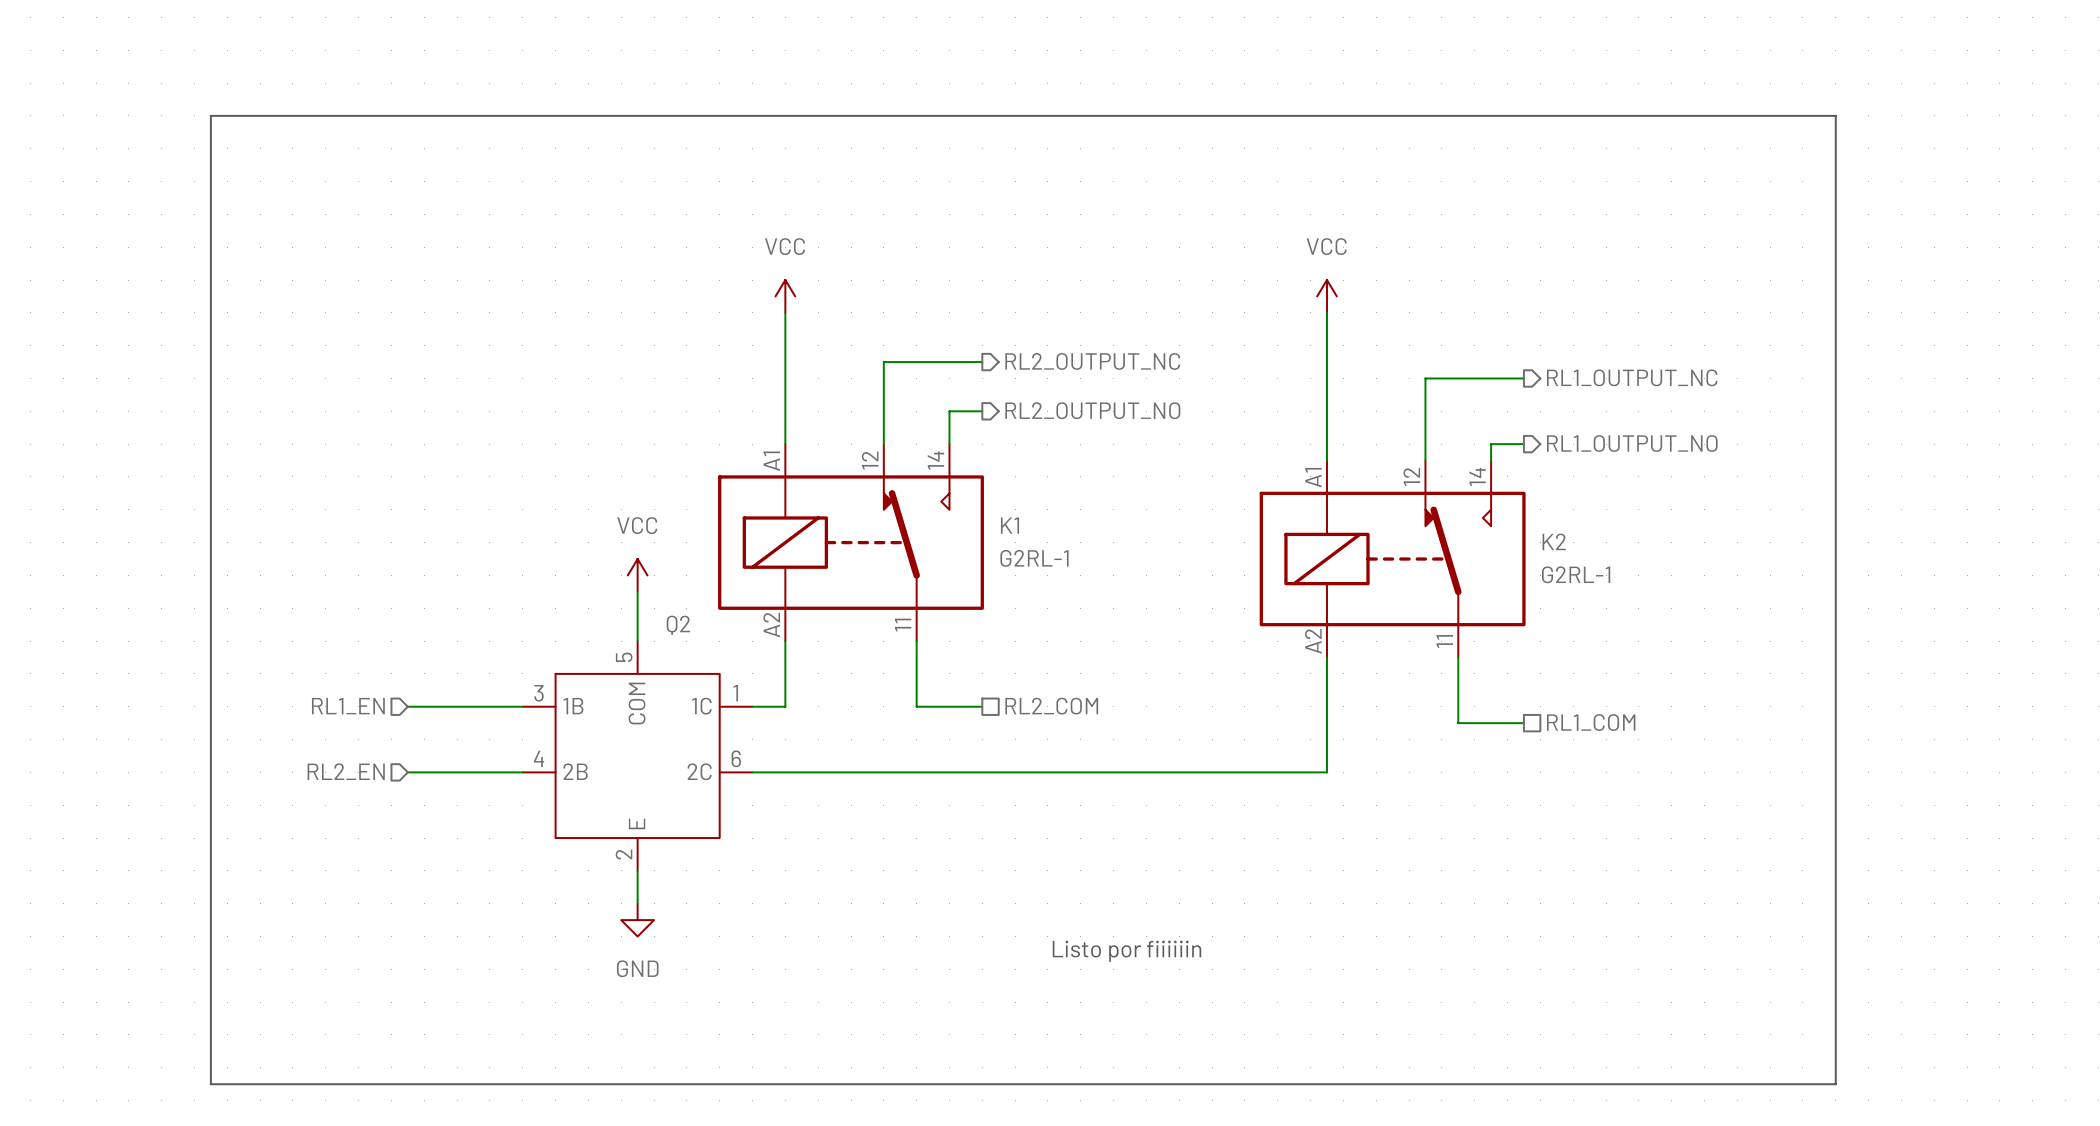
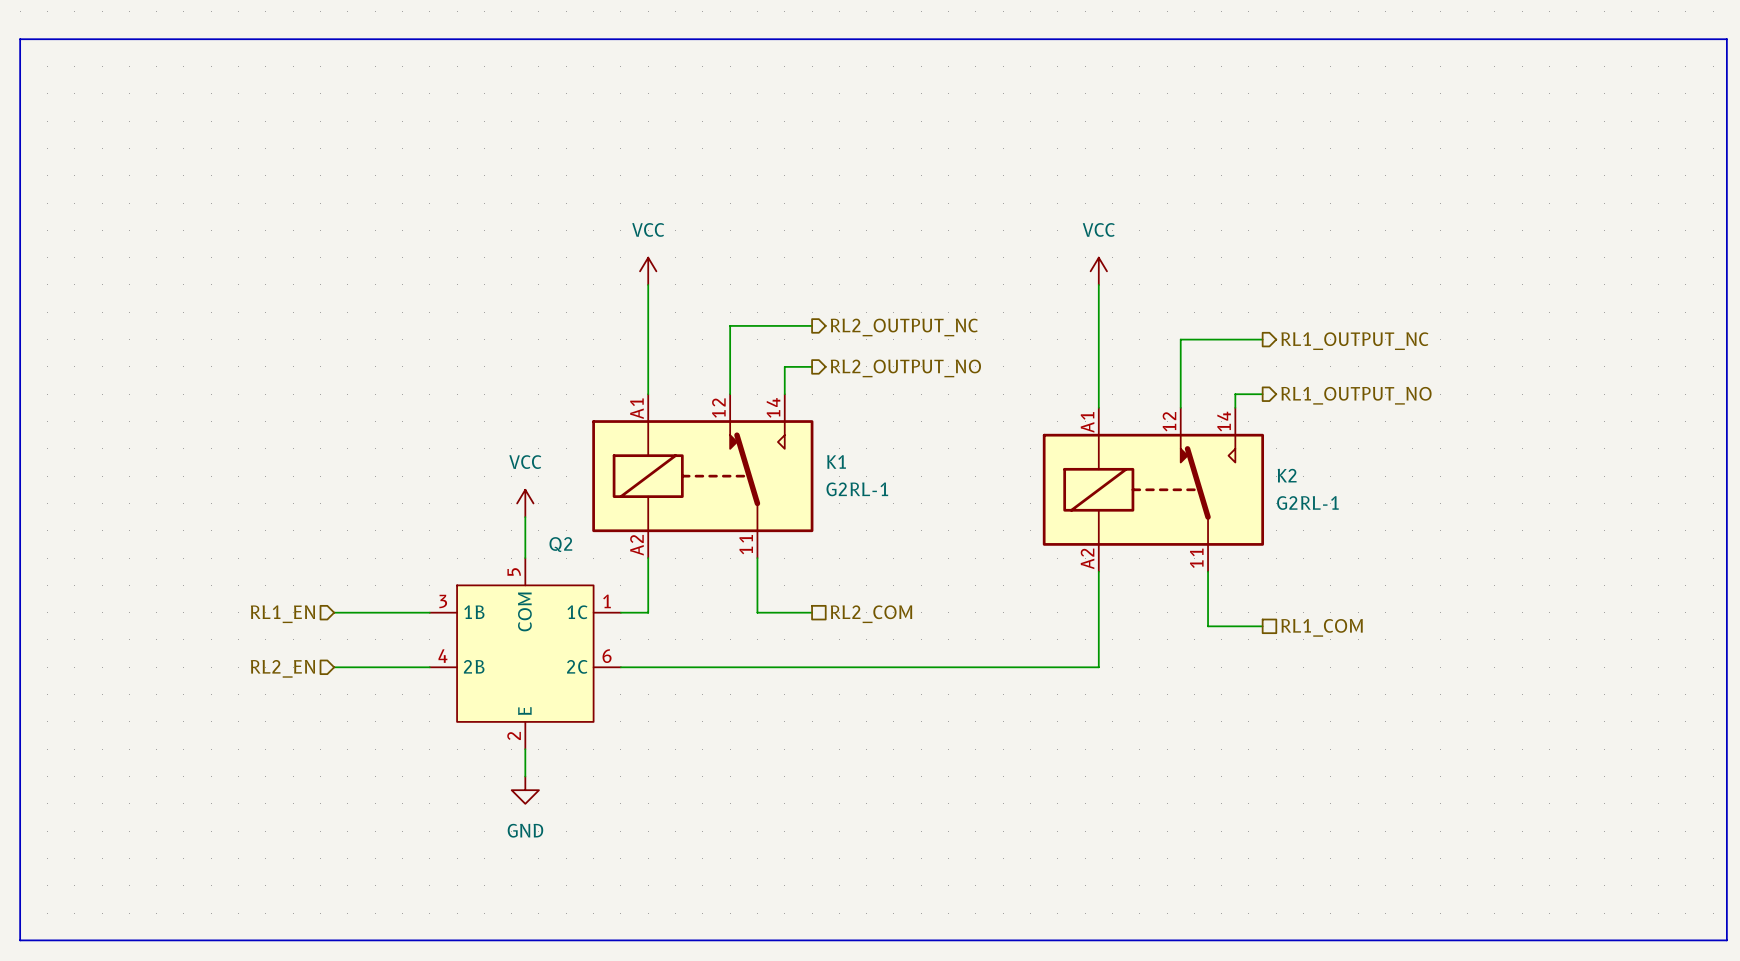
line: (210, 115) (1835, 115) (1835, 1084) (210, 1084) (210, 115) -> (20, 39) (20, 940) (1726, 940) (1726, 39) (20, 39)
text: Listo por fiiiiiin (1126, 951) -> none

